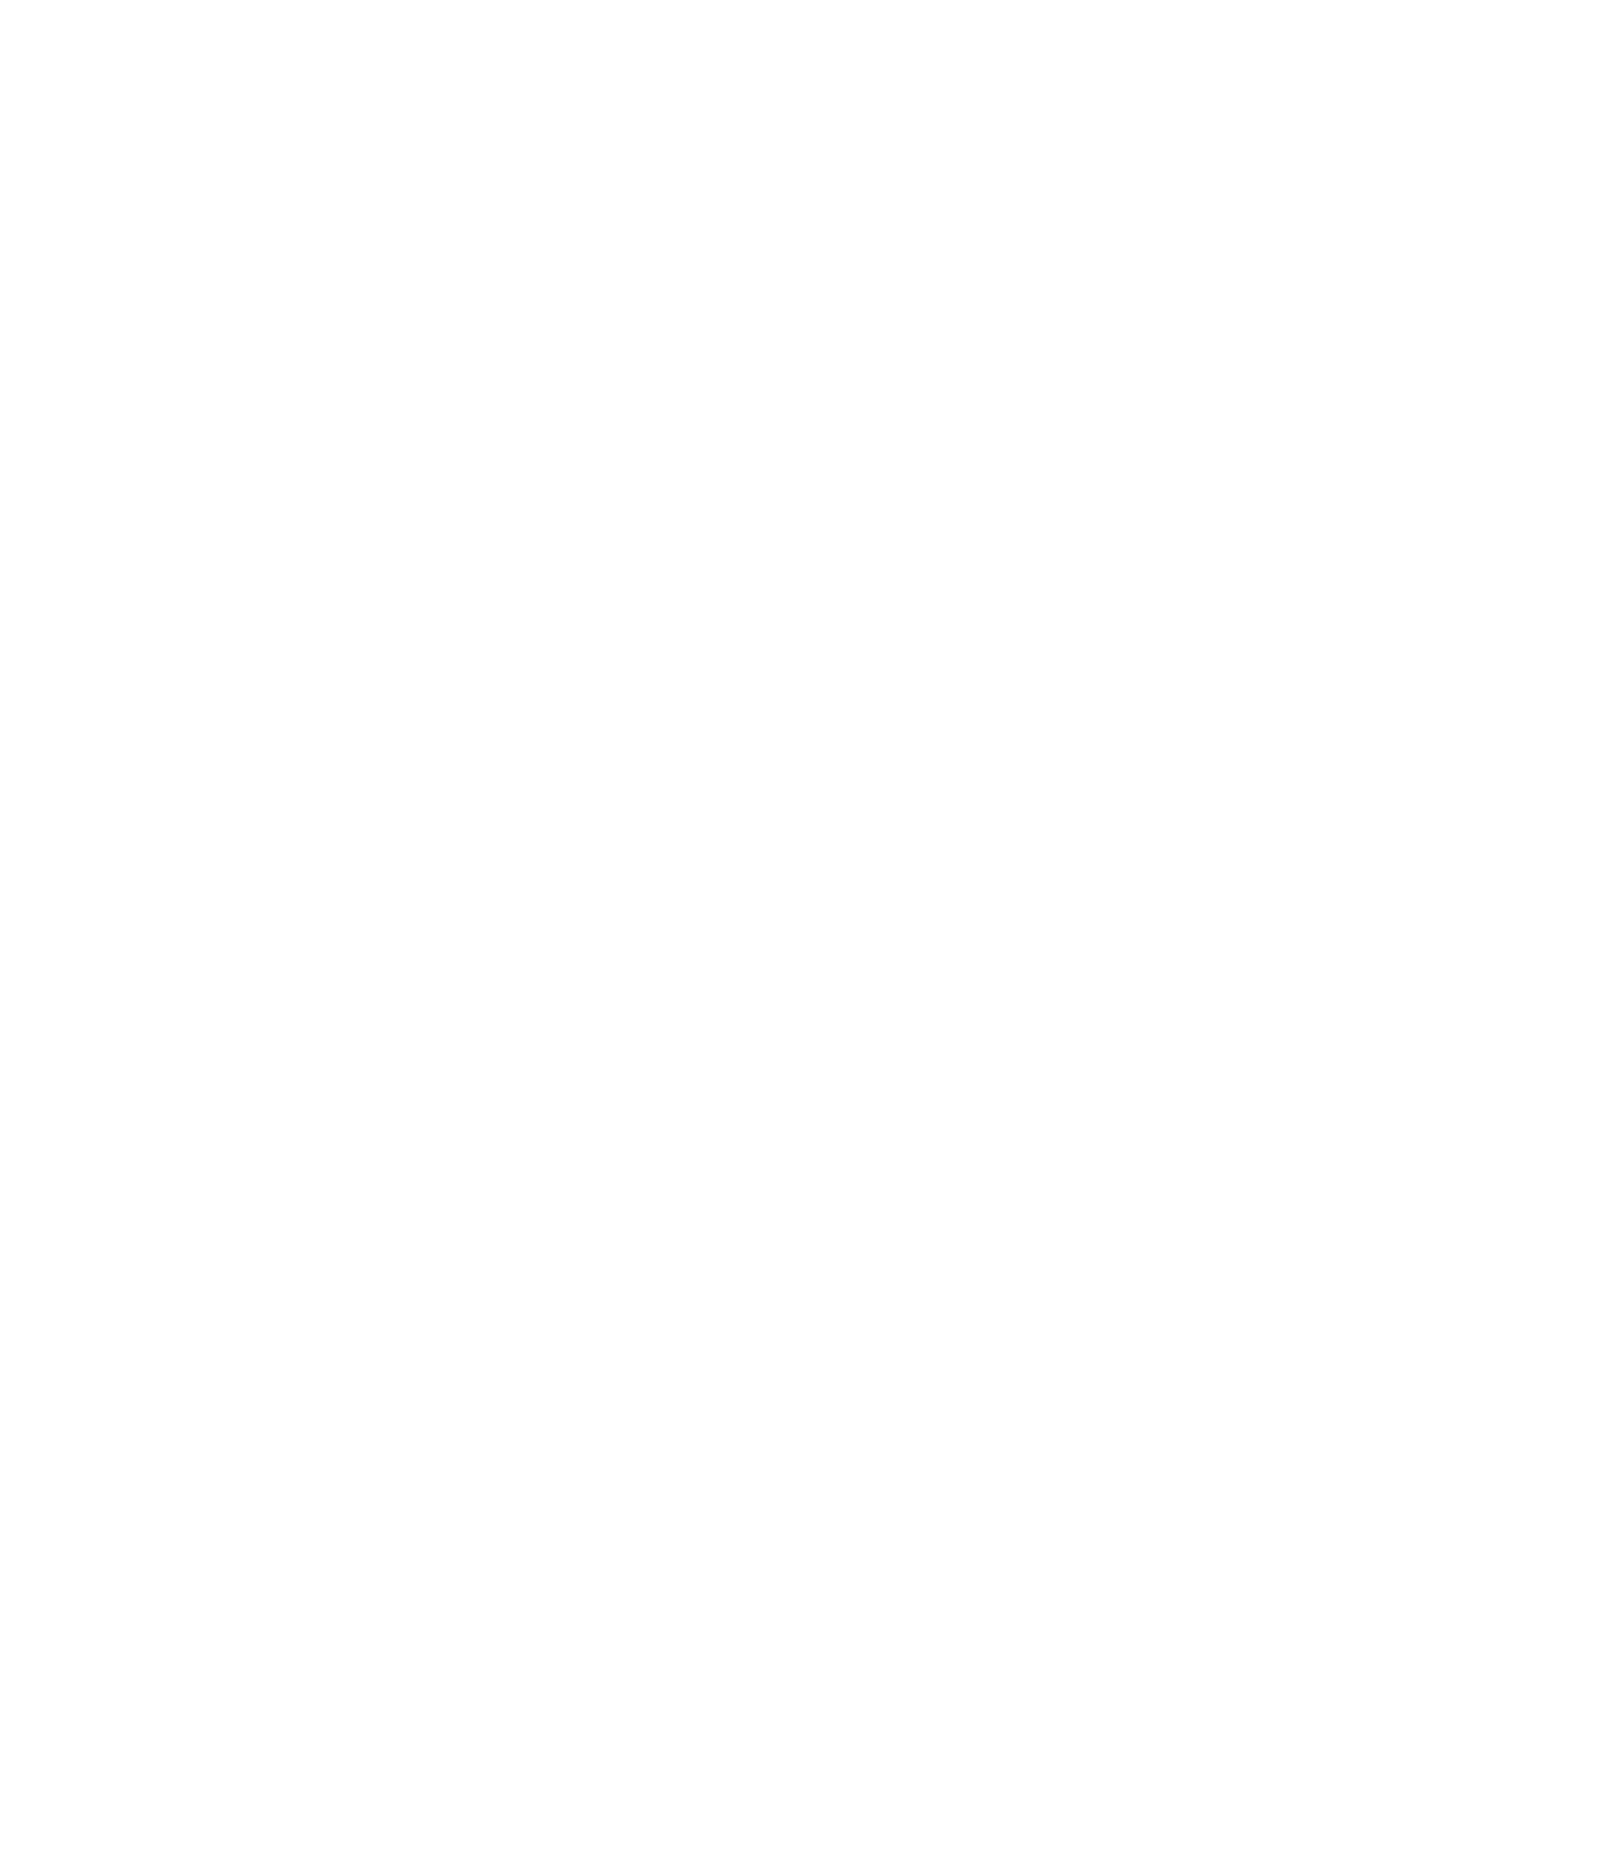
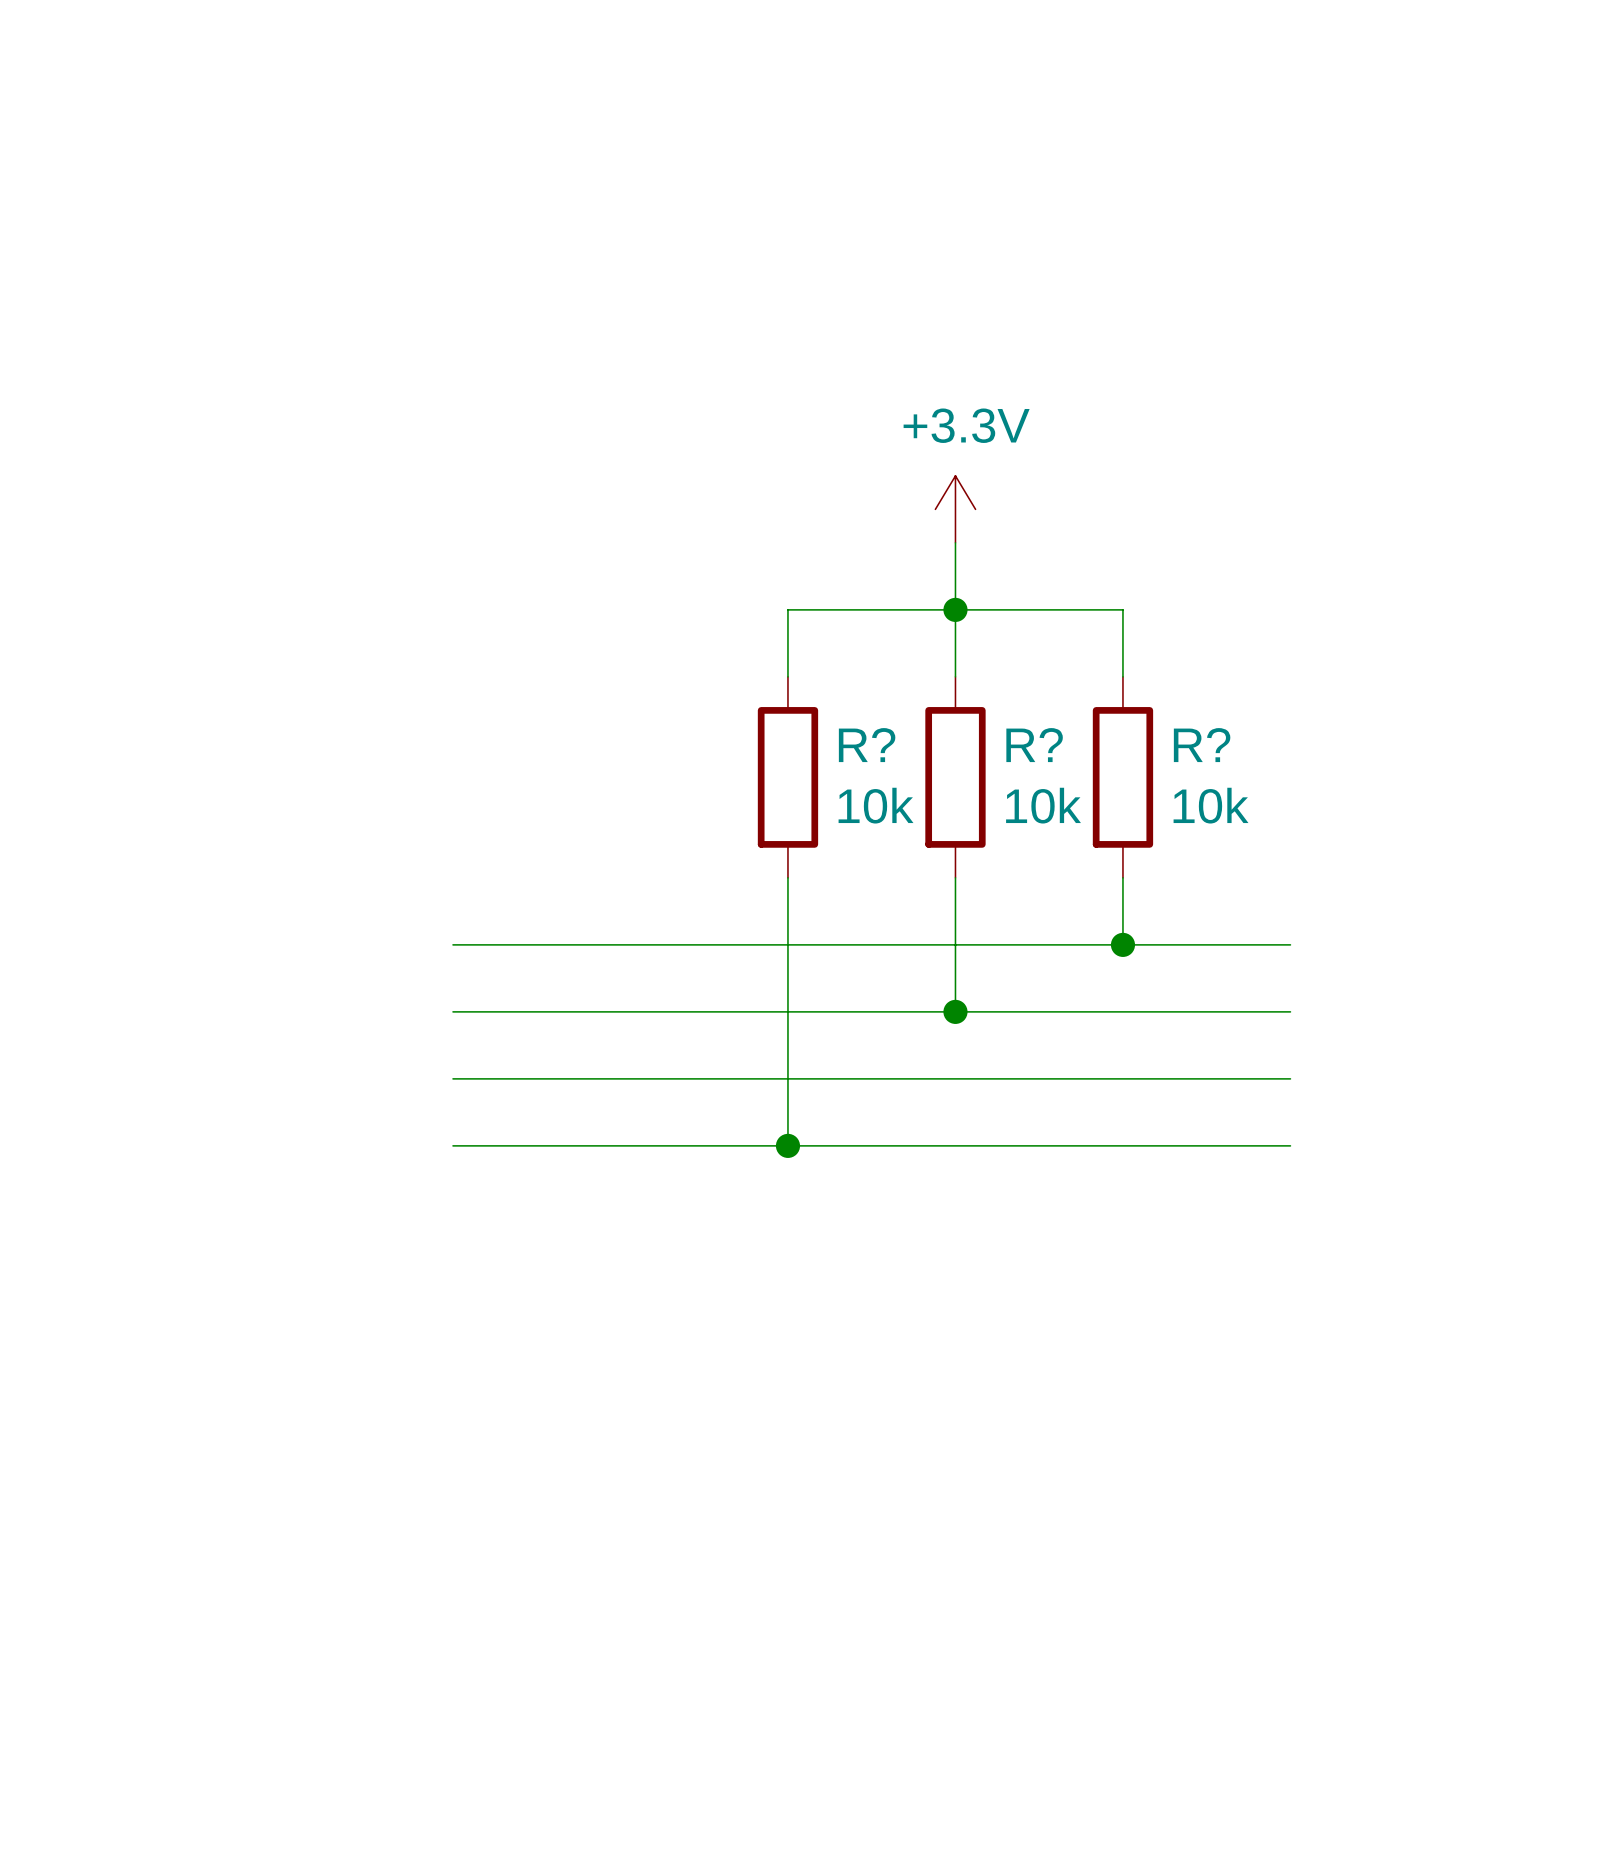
power symbol: none -> +3.3V (955, 509)
wire: none -> (955, 542) (955, 676)
junction: none -> (955, 609)
wire: none -> (787, 676) (787, 609) (1122, 609) (1122, 676)
R?: none -> 10k (787, 777)
R?: none -> 10k (955, 777)
R?: none -> 10k (1122, 777)
wire: none -> (787, 877) (787, 1145)
wire: none -> (955, 877) (955, 1011)
wire: none -> (1122, 877) (1122, 944)
wire: none -> (452, 944) (1290, 944)
junction: none -> (1122, 944)
wire: none -> (452, 1011) (1290, 1011)
junction: none -> (955, 1011)
wire: none -> (452, 1078) (1290, 1078)
wire: none -> (452, 1145) (1290, 1145)
junction: none -> (787, 1145)

